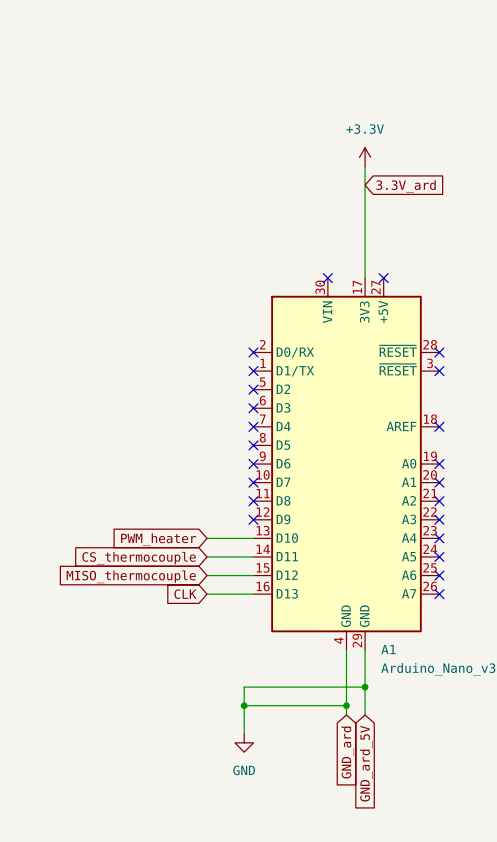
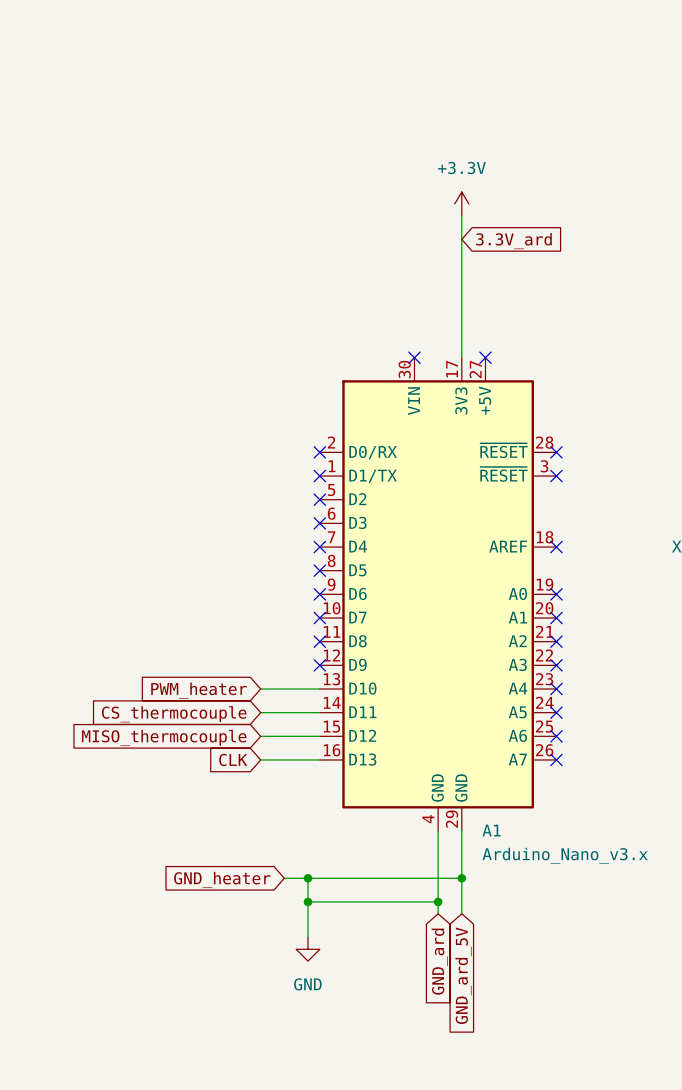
wire: none -> (284, 878) (308, 878)
junction: none -> (308, 878)
global label: none -> GND_heater (222, 879)

